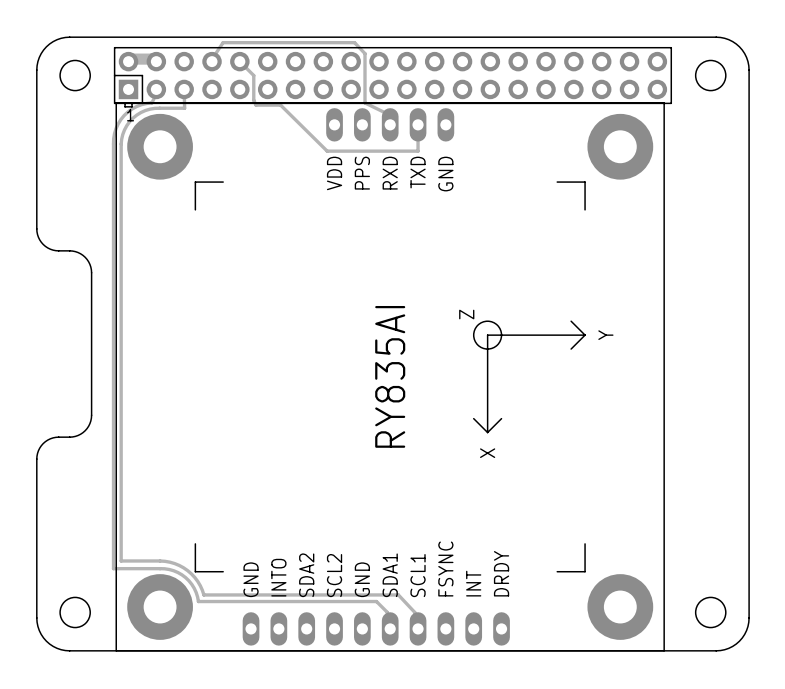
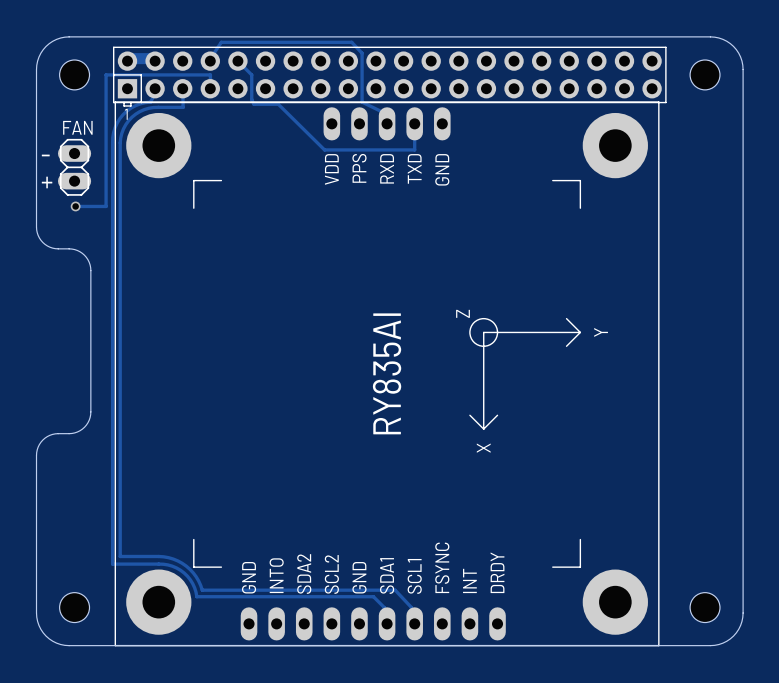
track: none -> (210, 88) (210, 74) (106, 74) (106, 206) (75, 206)
text: none -> - (45, 155)
FAN: none -> (74, 167)
text: none -> + (47, 182)
via: none -> (75, 206)

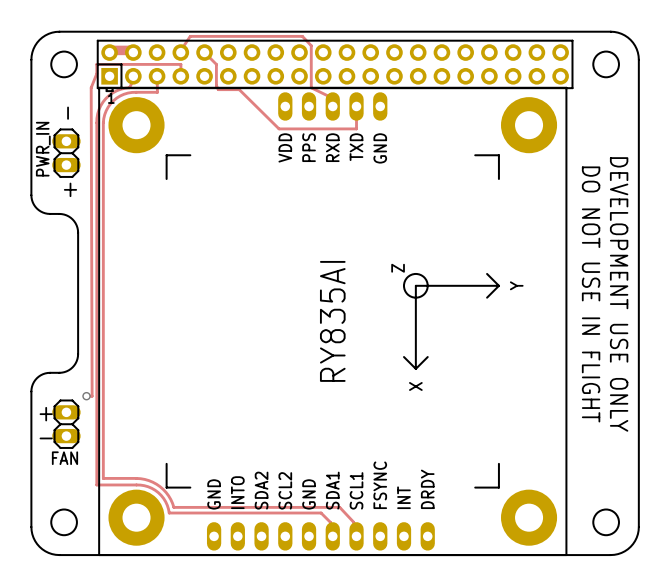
track: (112, 74) (106, 74) (106, 206) (75, 206) -> (96, 64) (96, 73) (91, 87) (92, 396) (86, 396)
text rotation: 0° (45, 155) -> 90° counterclockwise (68, 113)
FAN: (74, 167) -> none
PWR_IN: none -> (66, 153)
text position: + (47, 182) -> + (70, 189)
via: (75, 206) -> none
text: none -> DO NOT USE IN FLIGHT (591, 294)
text: none -> DEVELOPMENT USE ONLY (619, 294)
via: none -> (86, 396)
text: none -> + (46, 414)
FAN: none -> (66, 424)
text: none -> - (46, 438)

